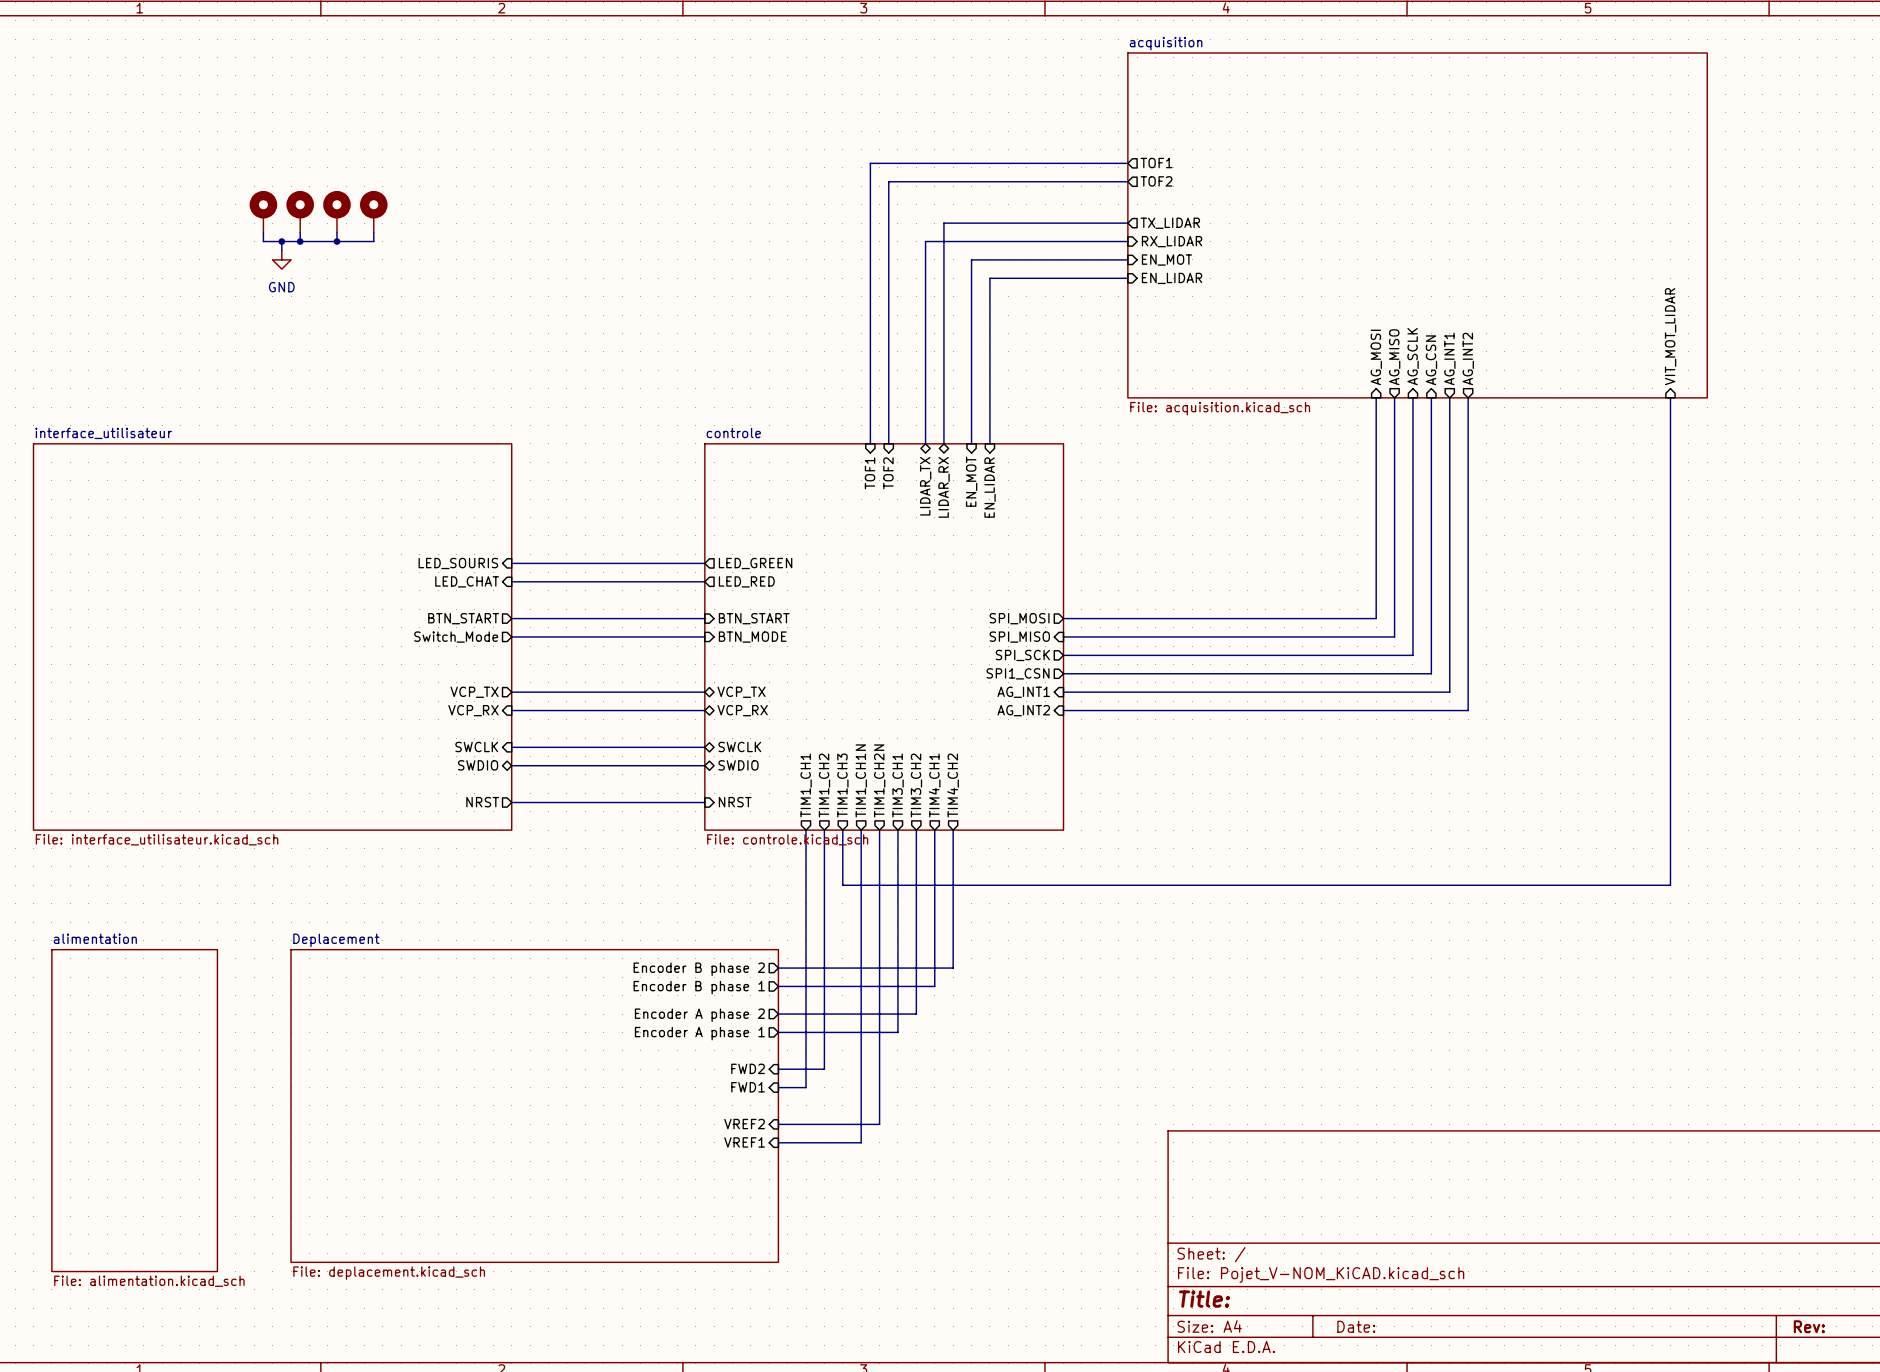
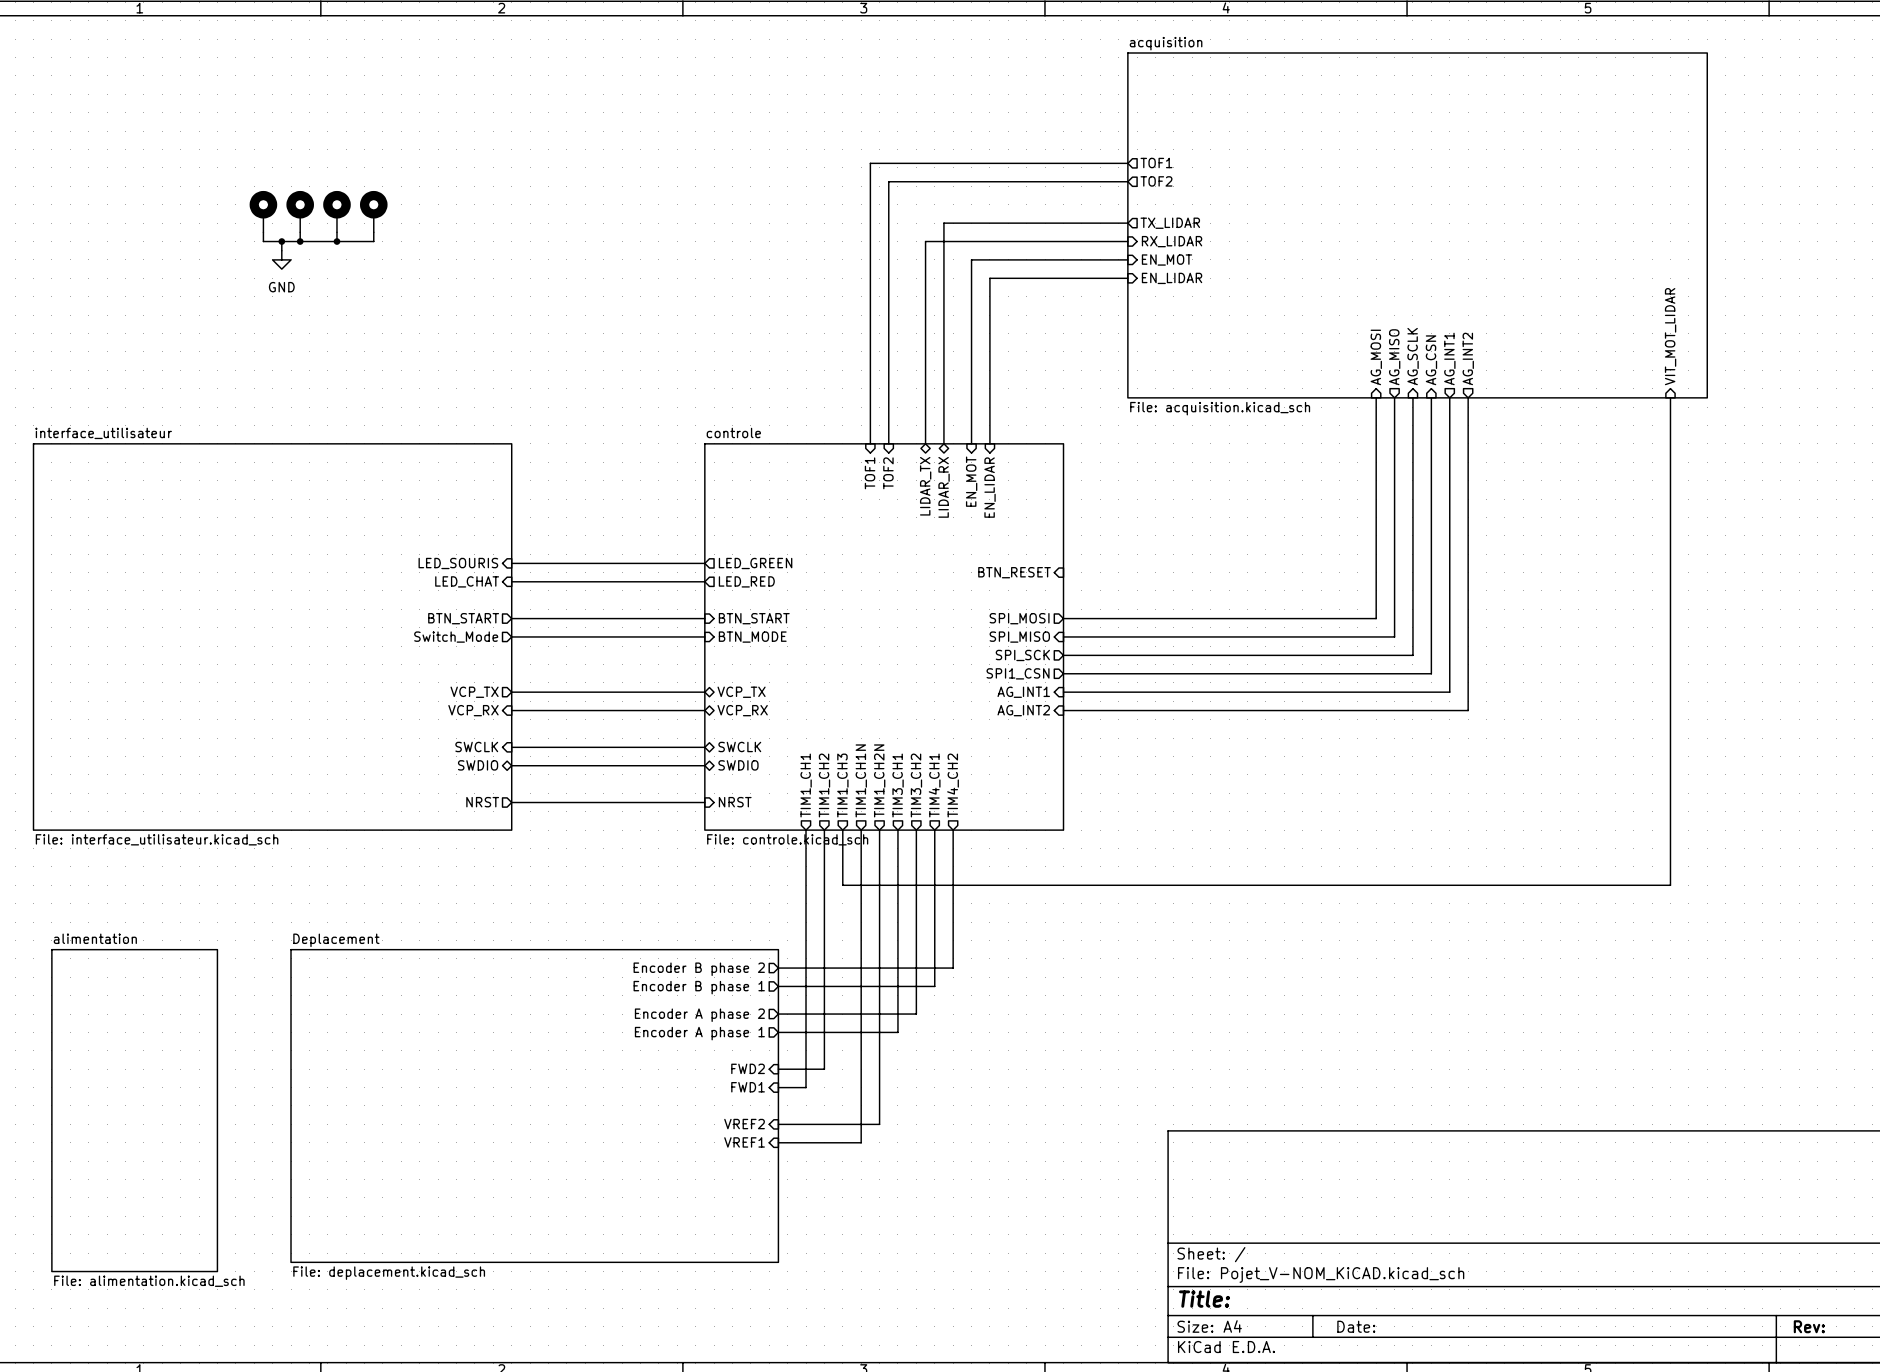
sheet pin: none -> BTN_RESET (1014, 572)

